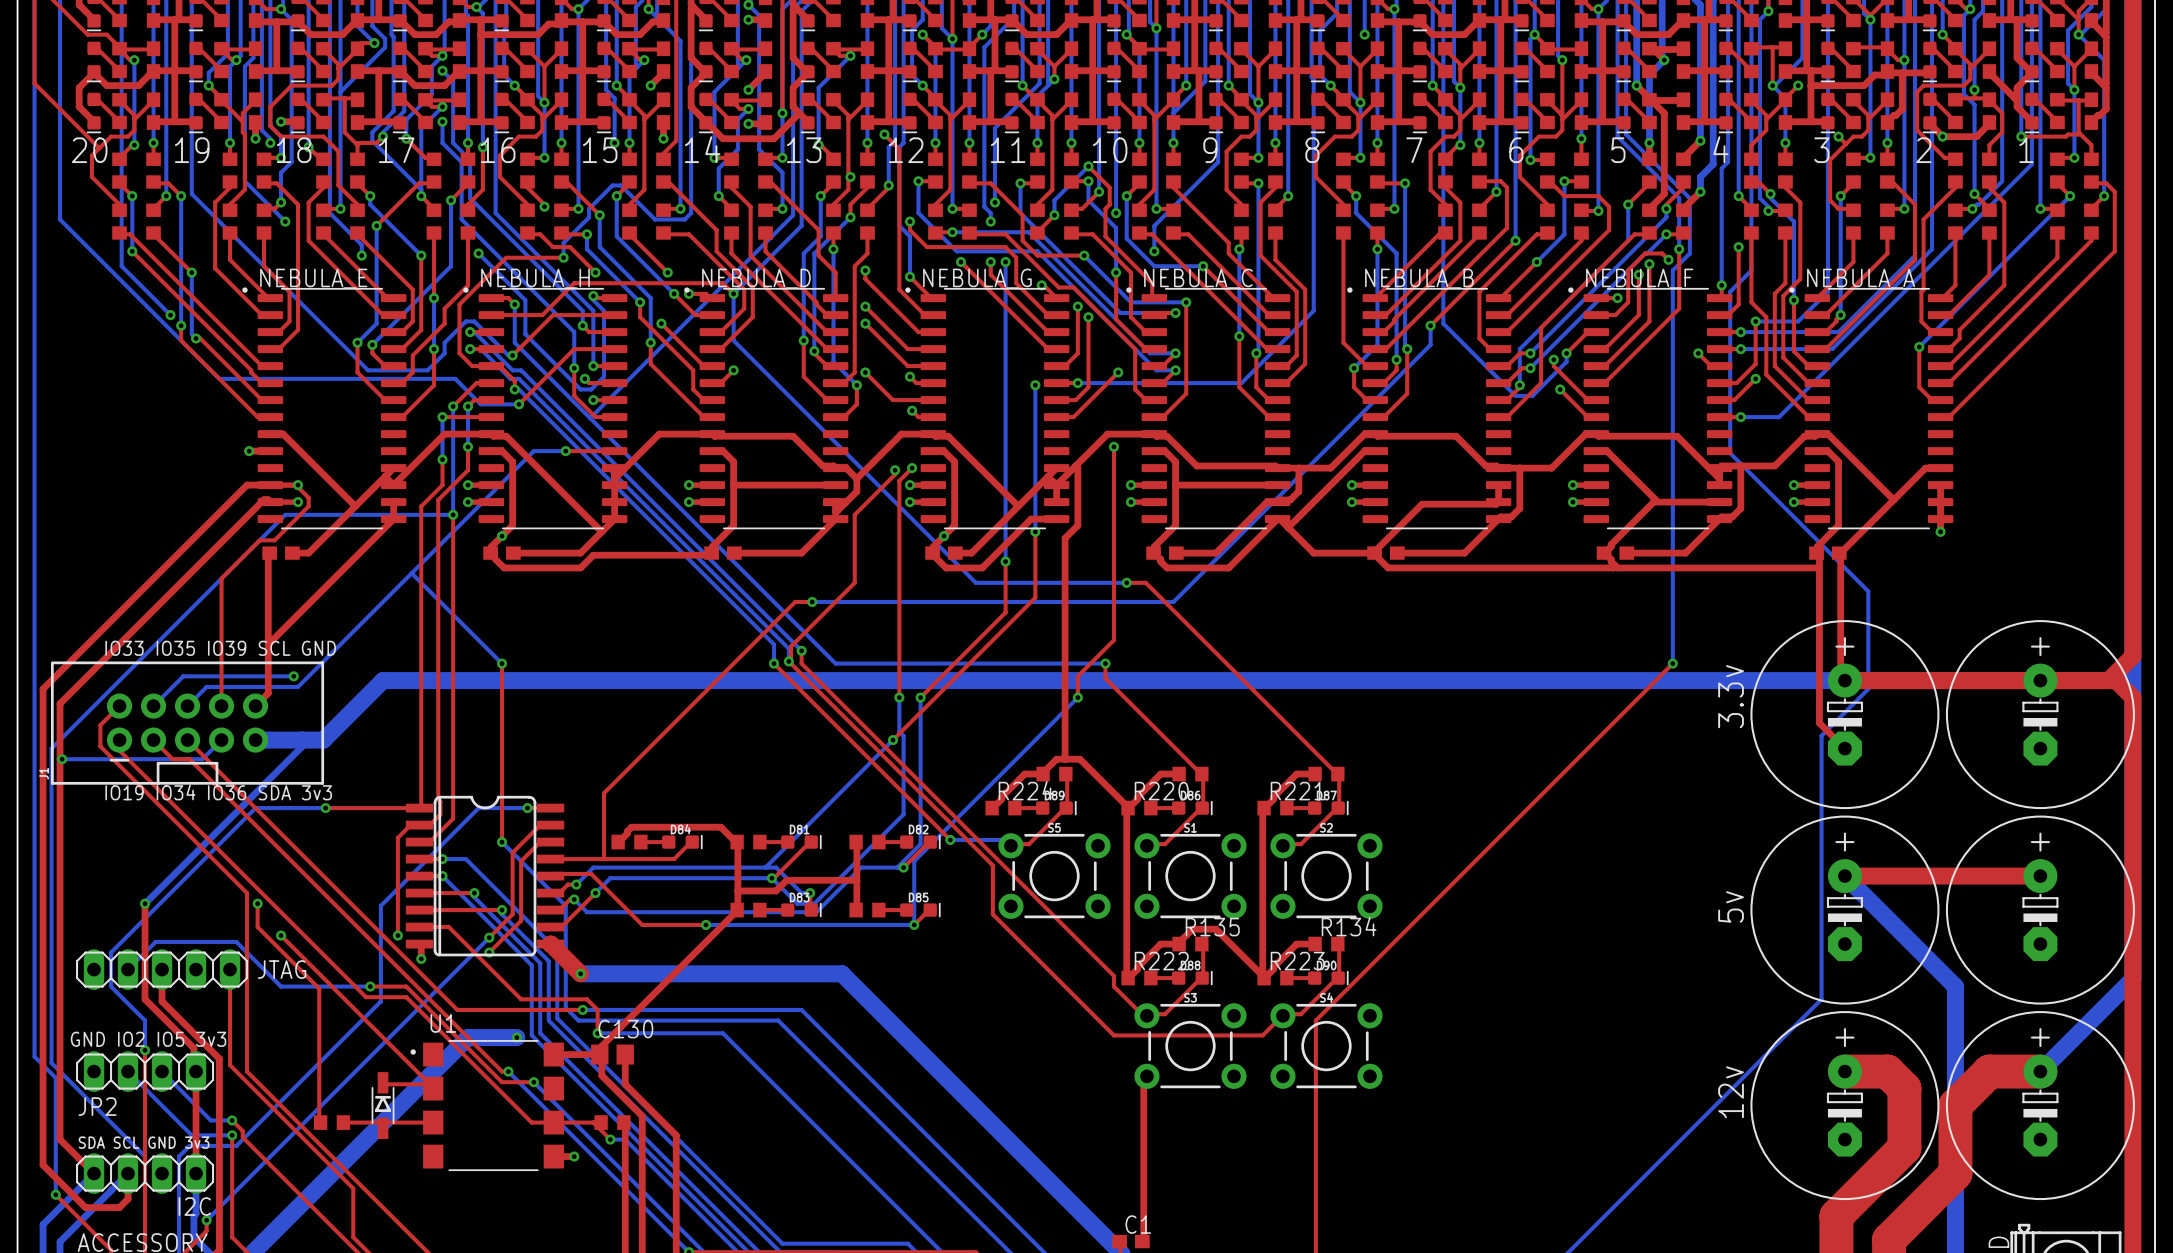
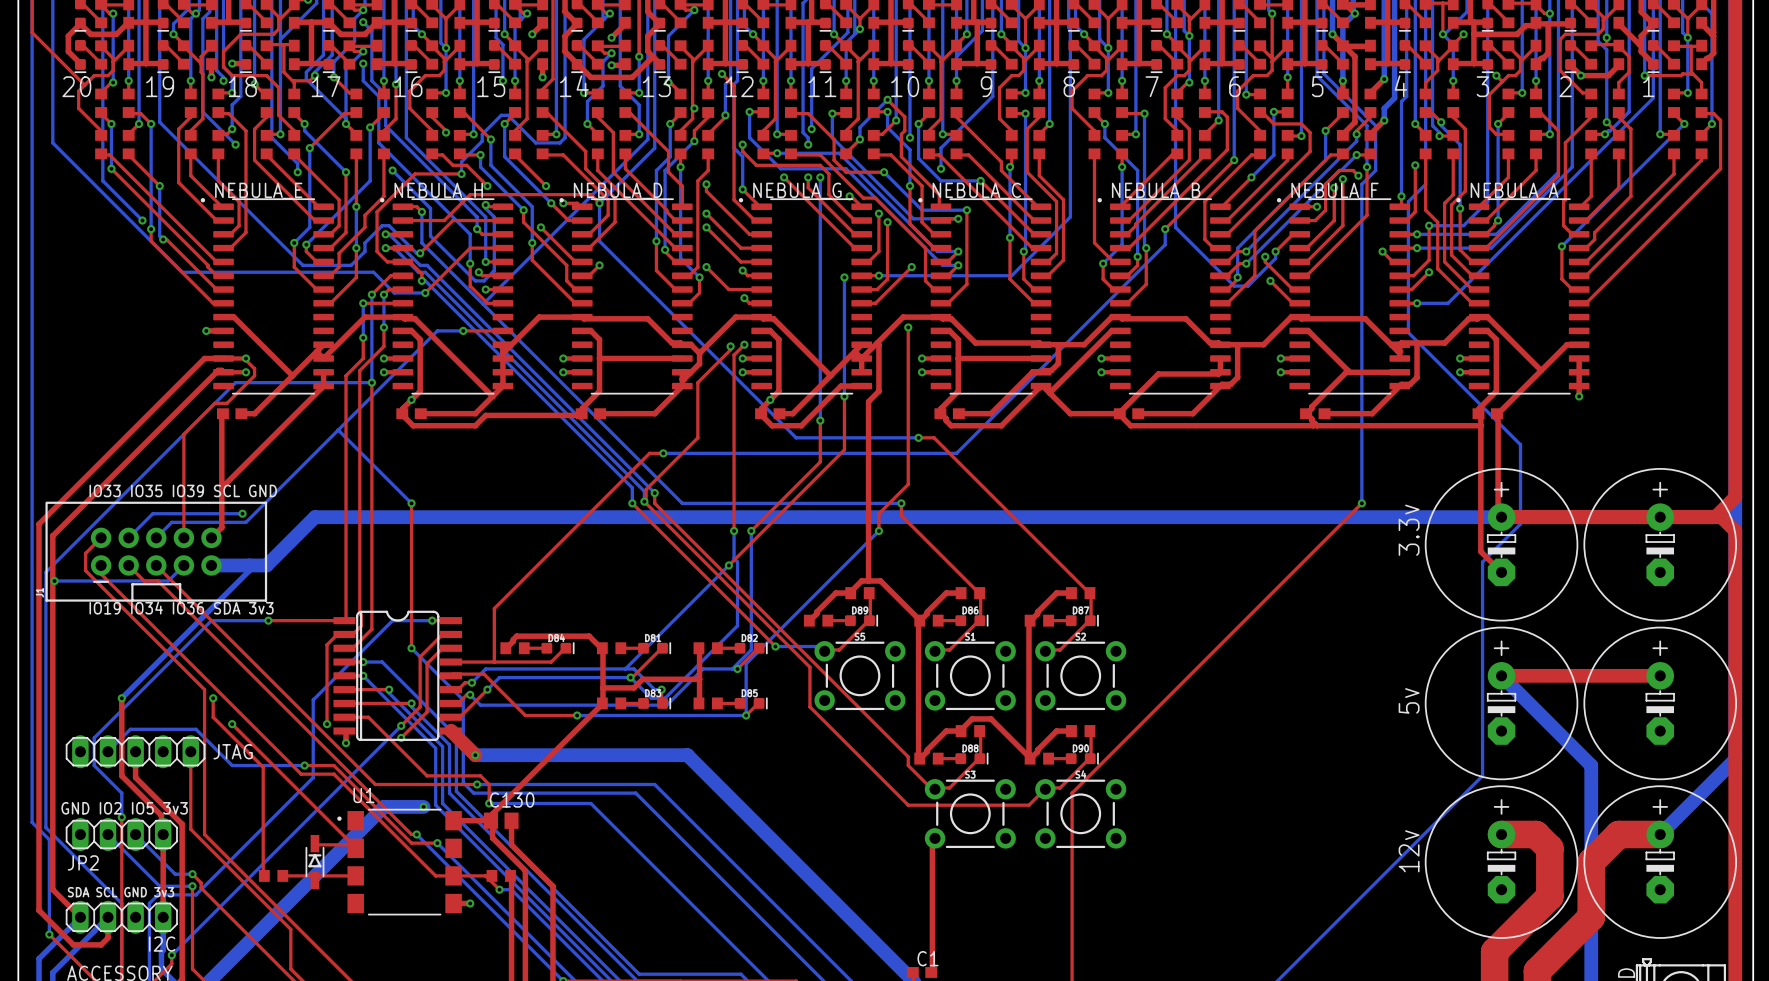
R224 name: R224 (1026, 790) -> none
R220 name: R220 (1161, 791) -> none
R221 name: R221 (1297, 791) -> none
R134 name: R134 (1349, 926) -> none
R135 name: R135 (1212, 927) -> none
R222 name: R222 (1161, 961) -> none
R223 name: R223 (1297, 961) -> none

